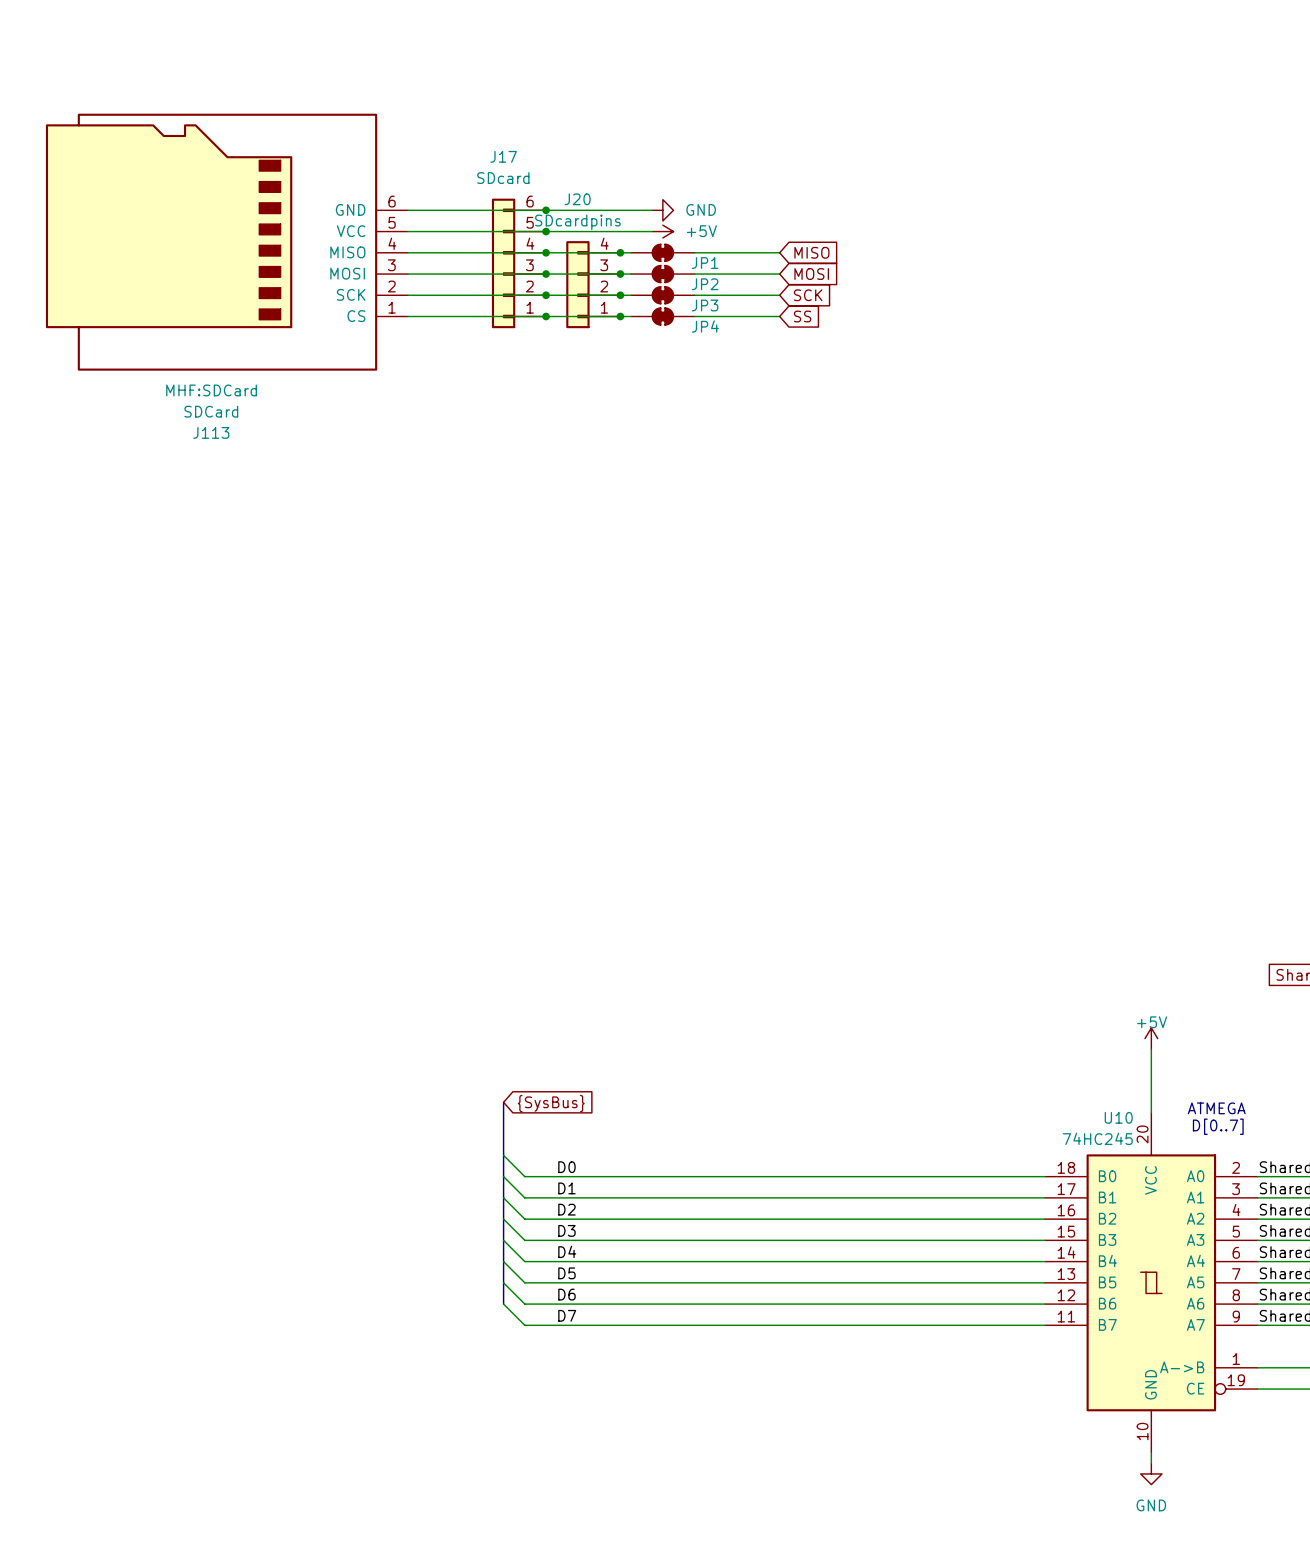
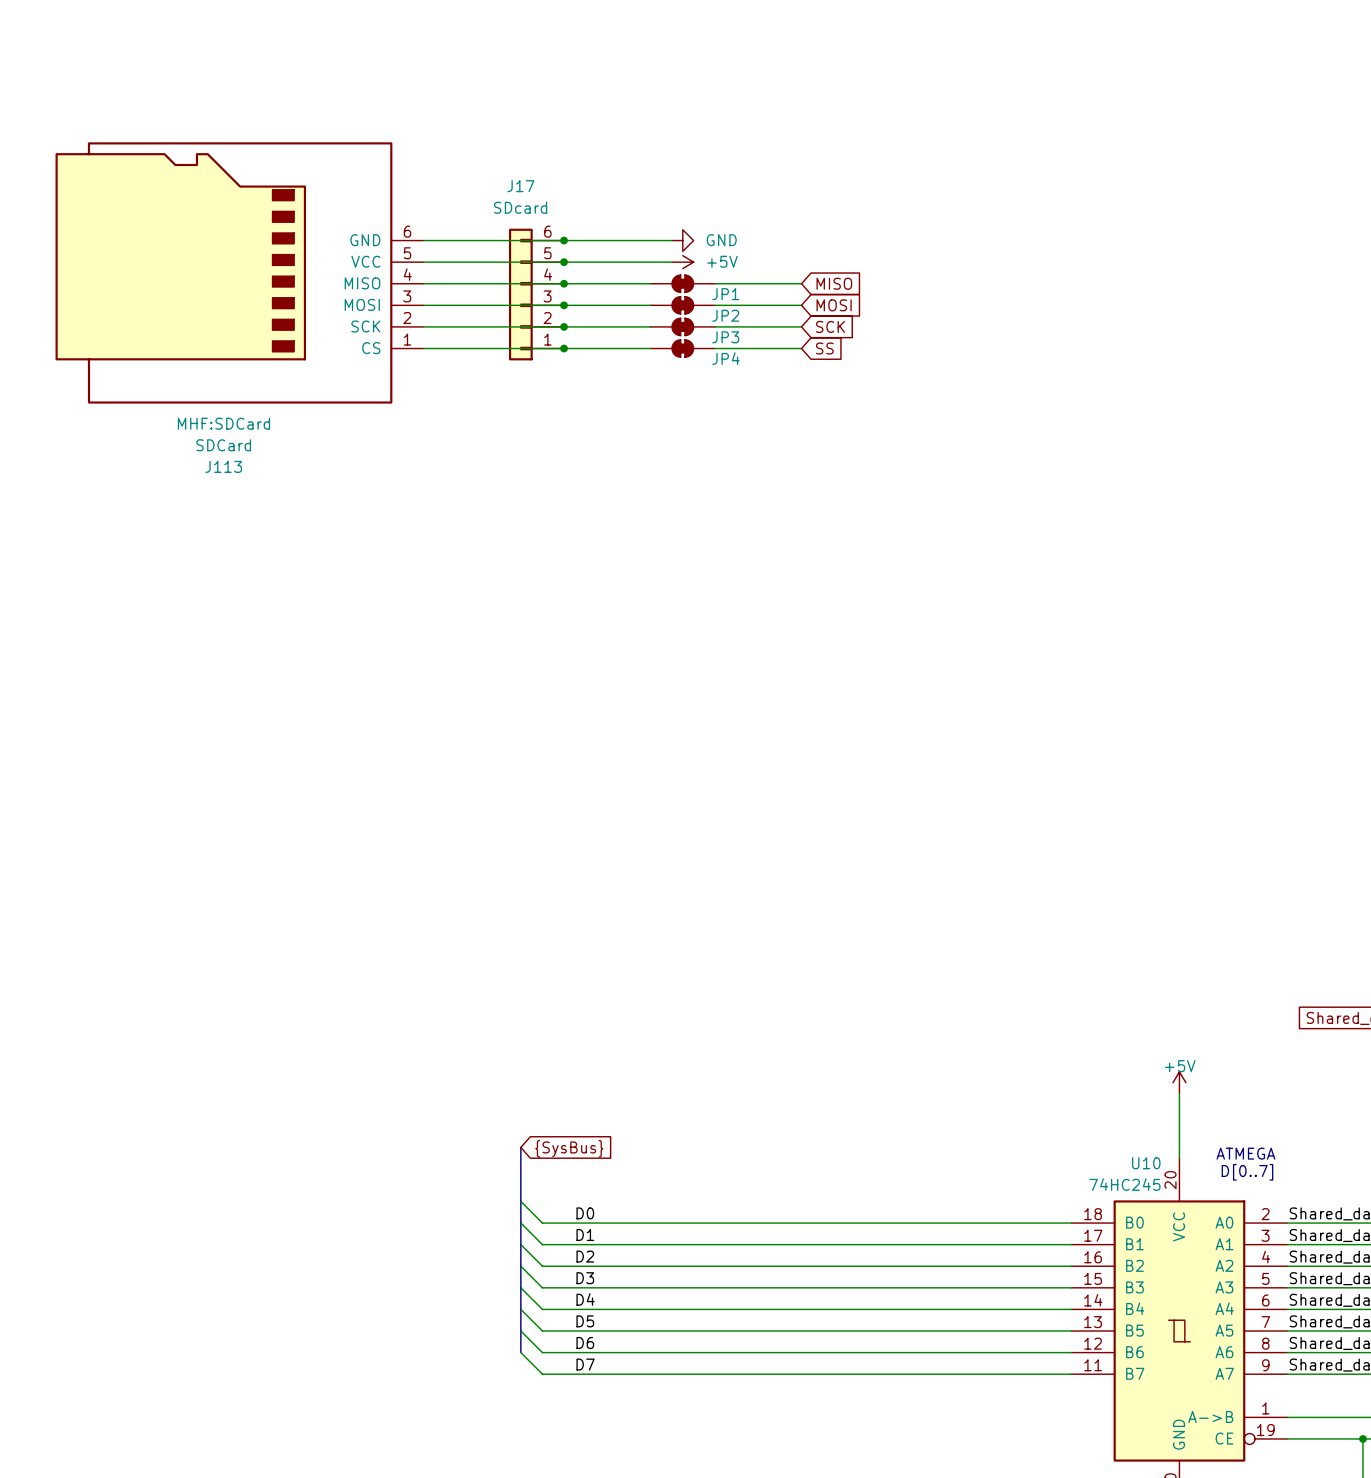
junction: (620, 252) -> none
junction: (620, 274) -> none
J20: SDcardpins (593, 284) -> none
junction: (620, 295) -> none
junction: (620, 316) -> none

